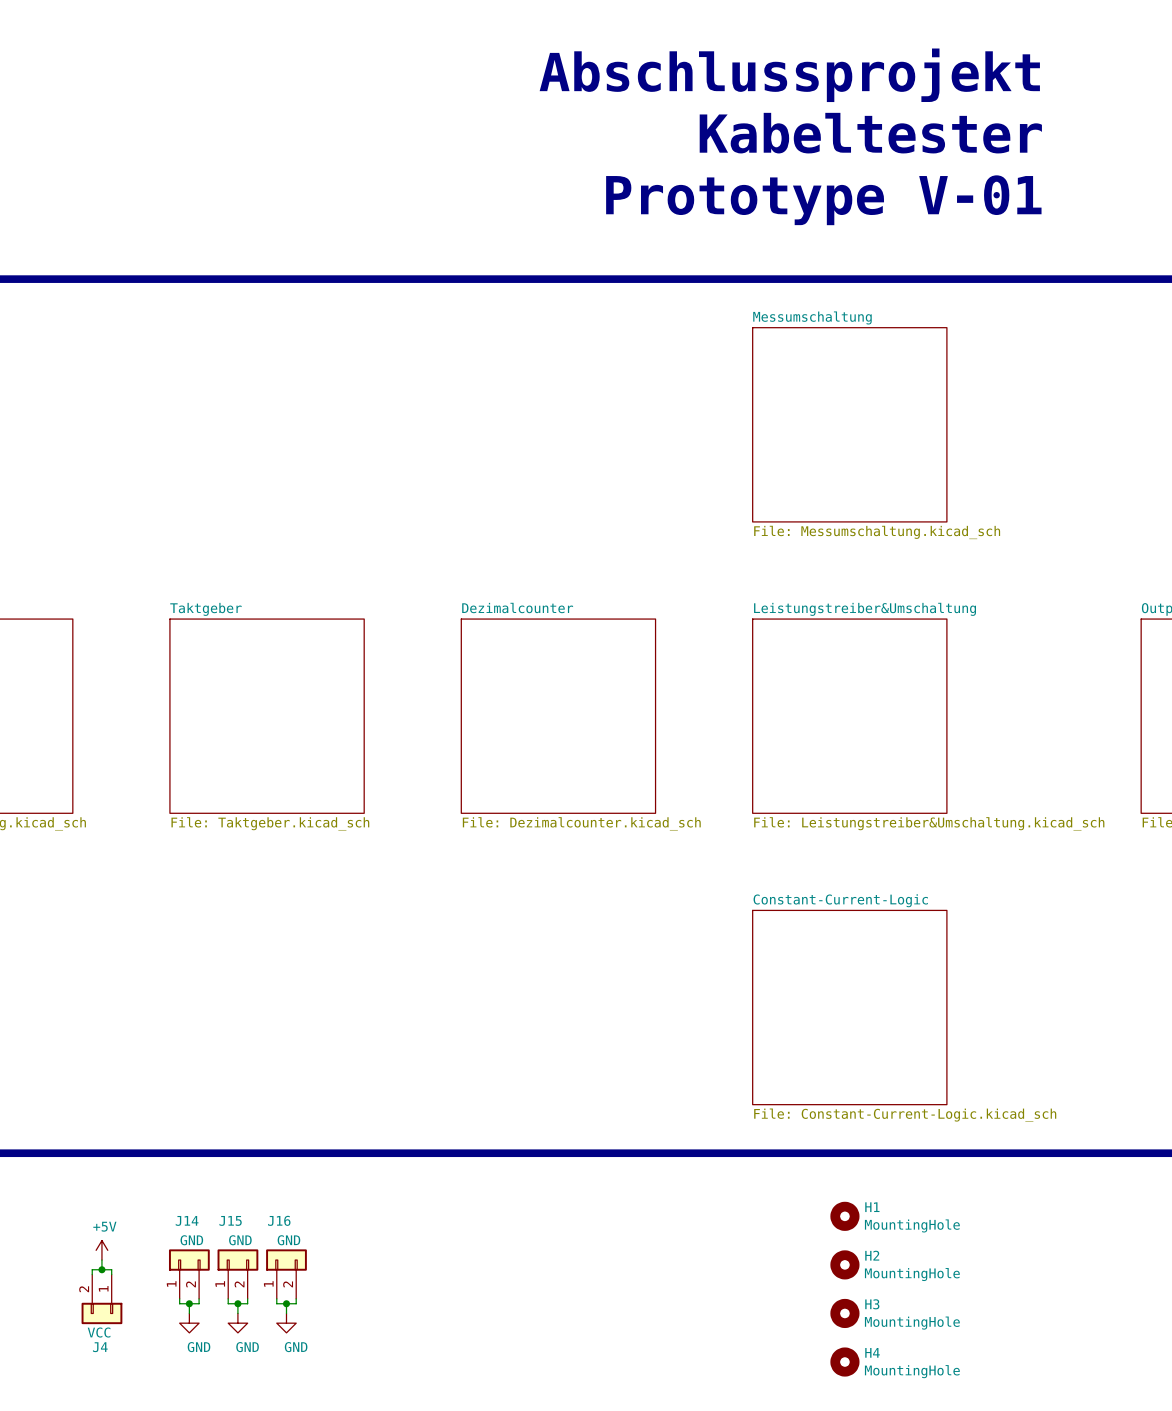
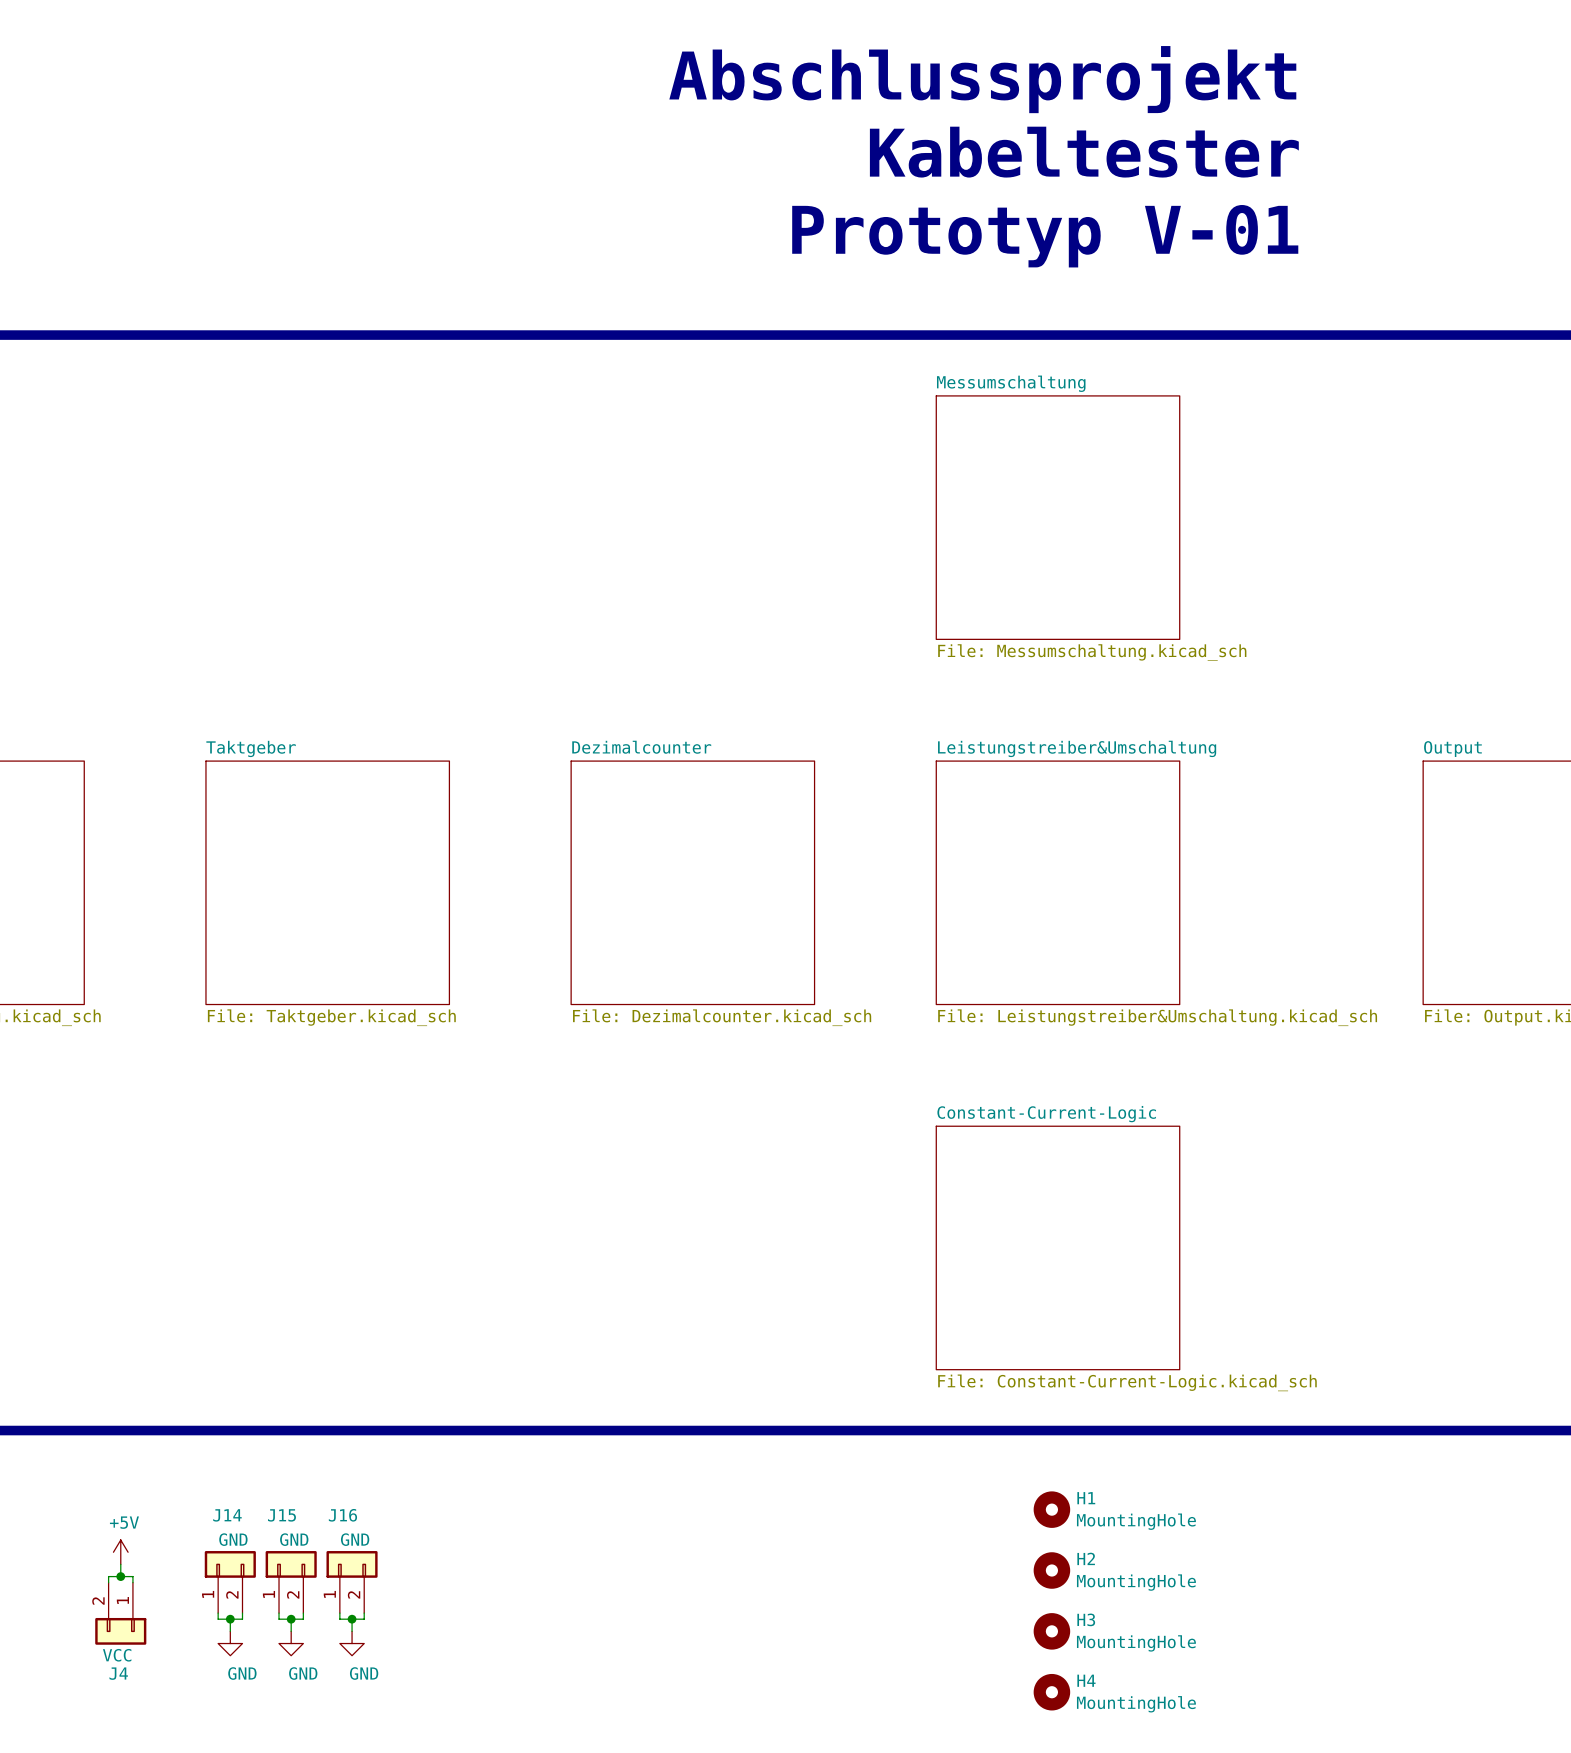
text: Prototype V-01 (823, 200) -> Prototyp V-01 (1045, 236)

